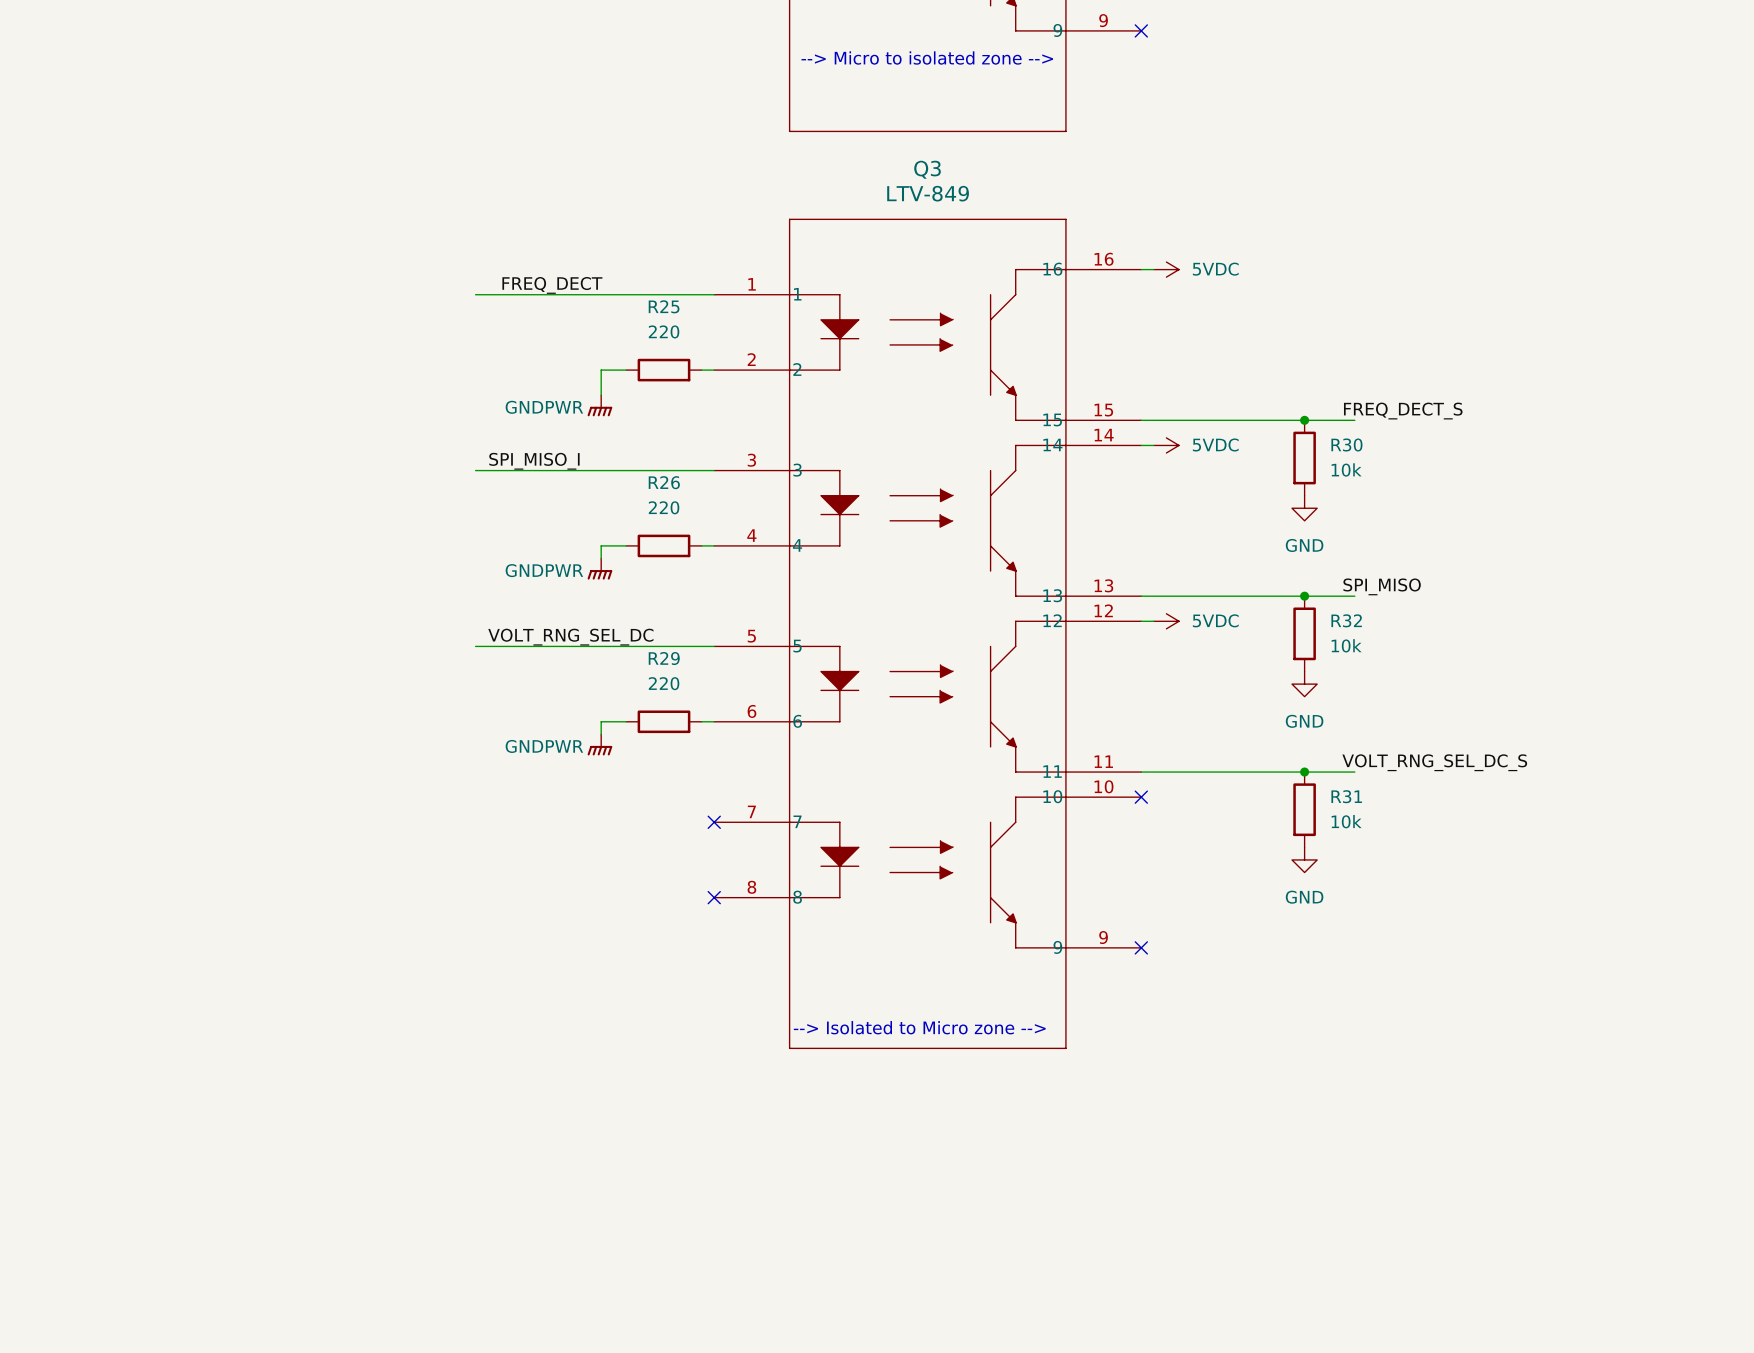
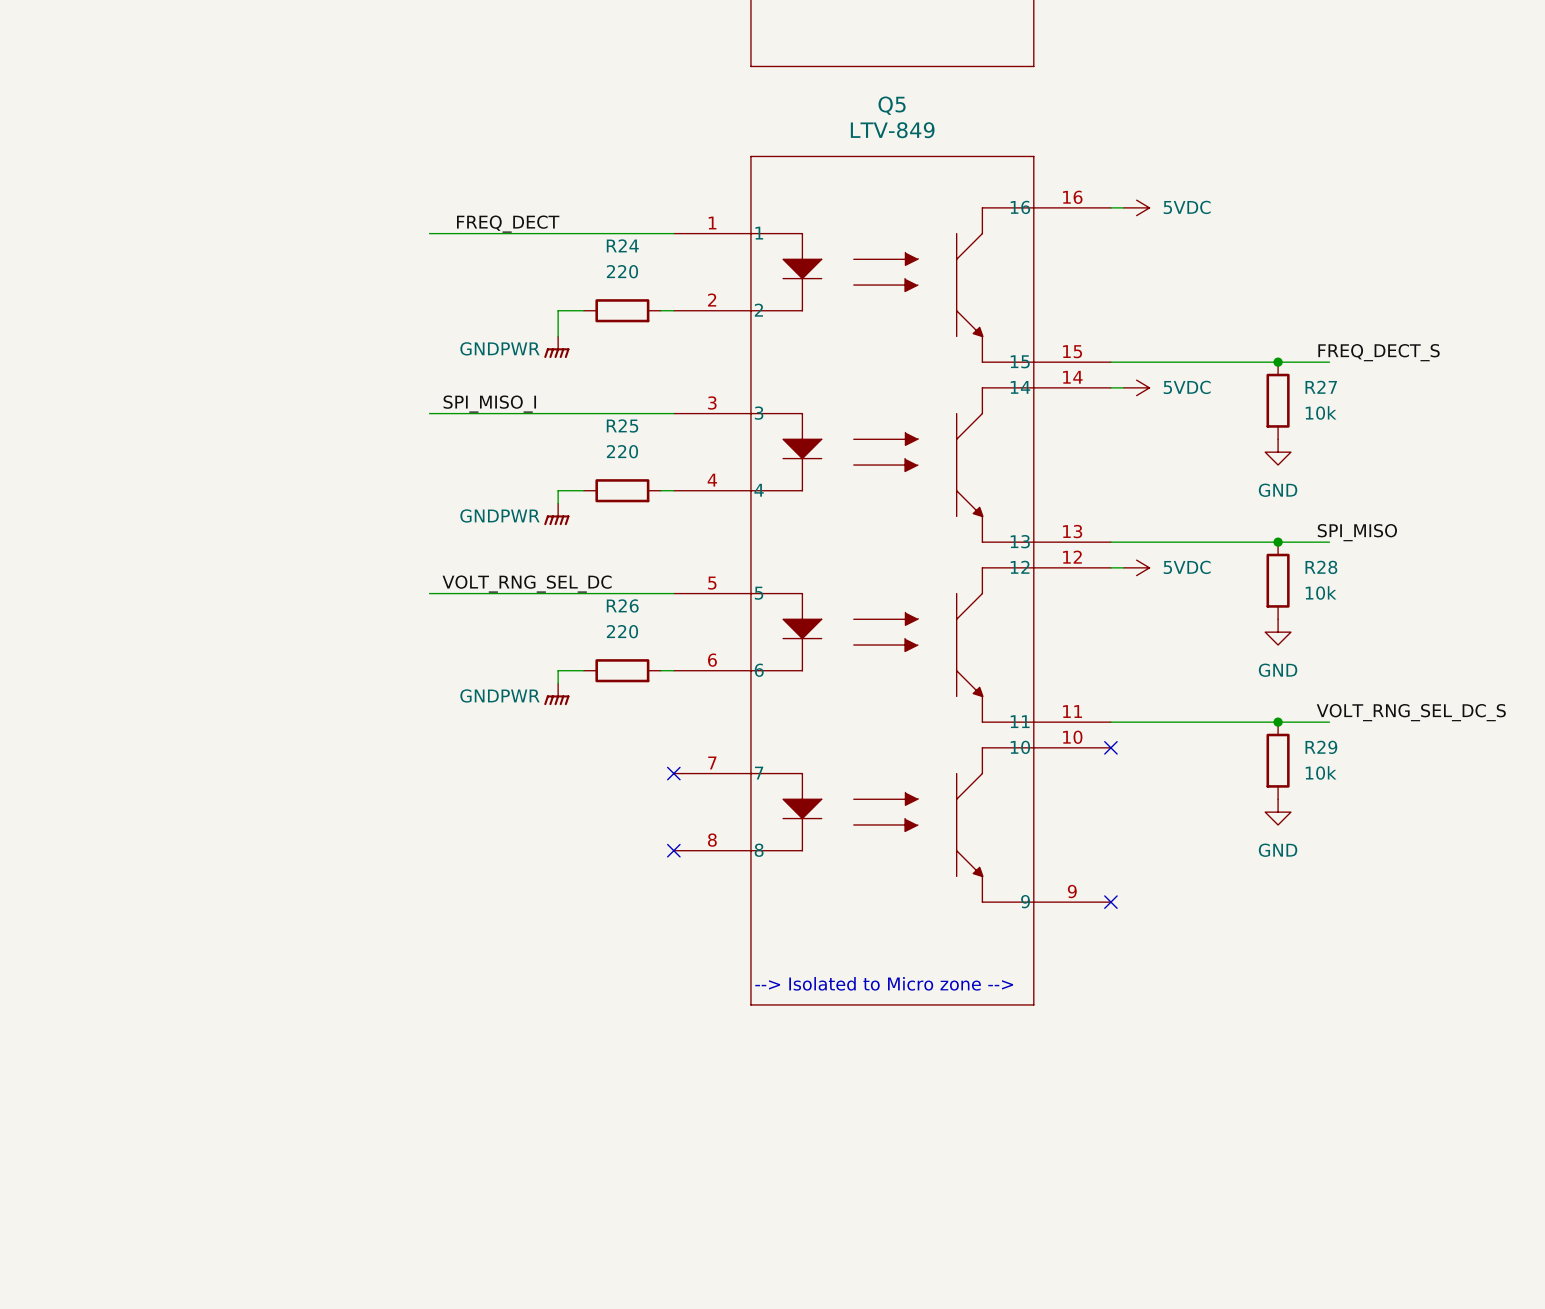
Q3 name: Q3 (927, 169) -> Q5 (892, 105)
R25 name: R25 (664, 306) -> R24 (622, 245)
R30 name: R30 (1346, 444) -> R27 (1321, 387)
R26 name: R26 (664, 482) -> R25 (622, 425)
R32 name: R32 (1346, 620) -> R28 (1321, 567)
R29 name: R29 (664, 658) -> R26 (622, 605)
R31 name: R31 (1346, 796) -> R29 (1321, 747)

